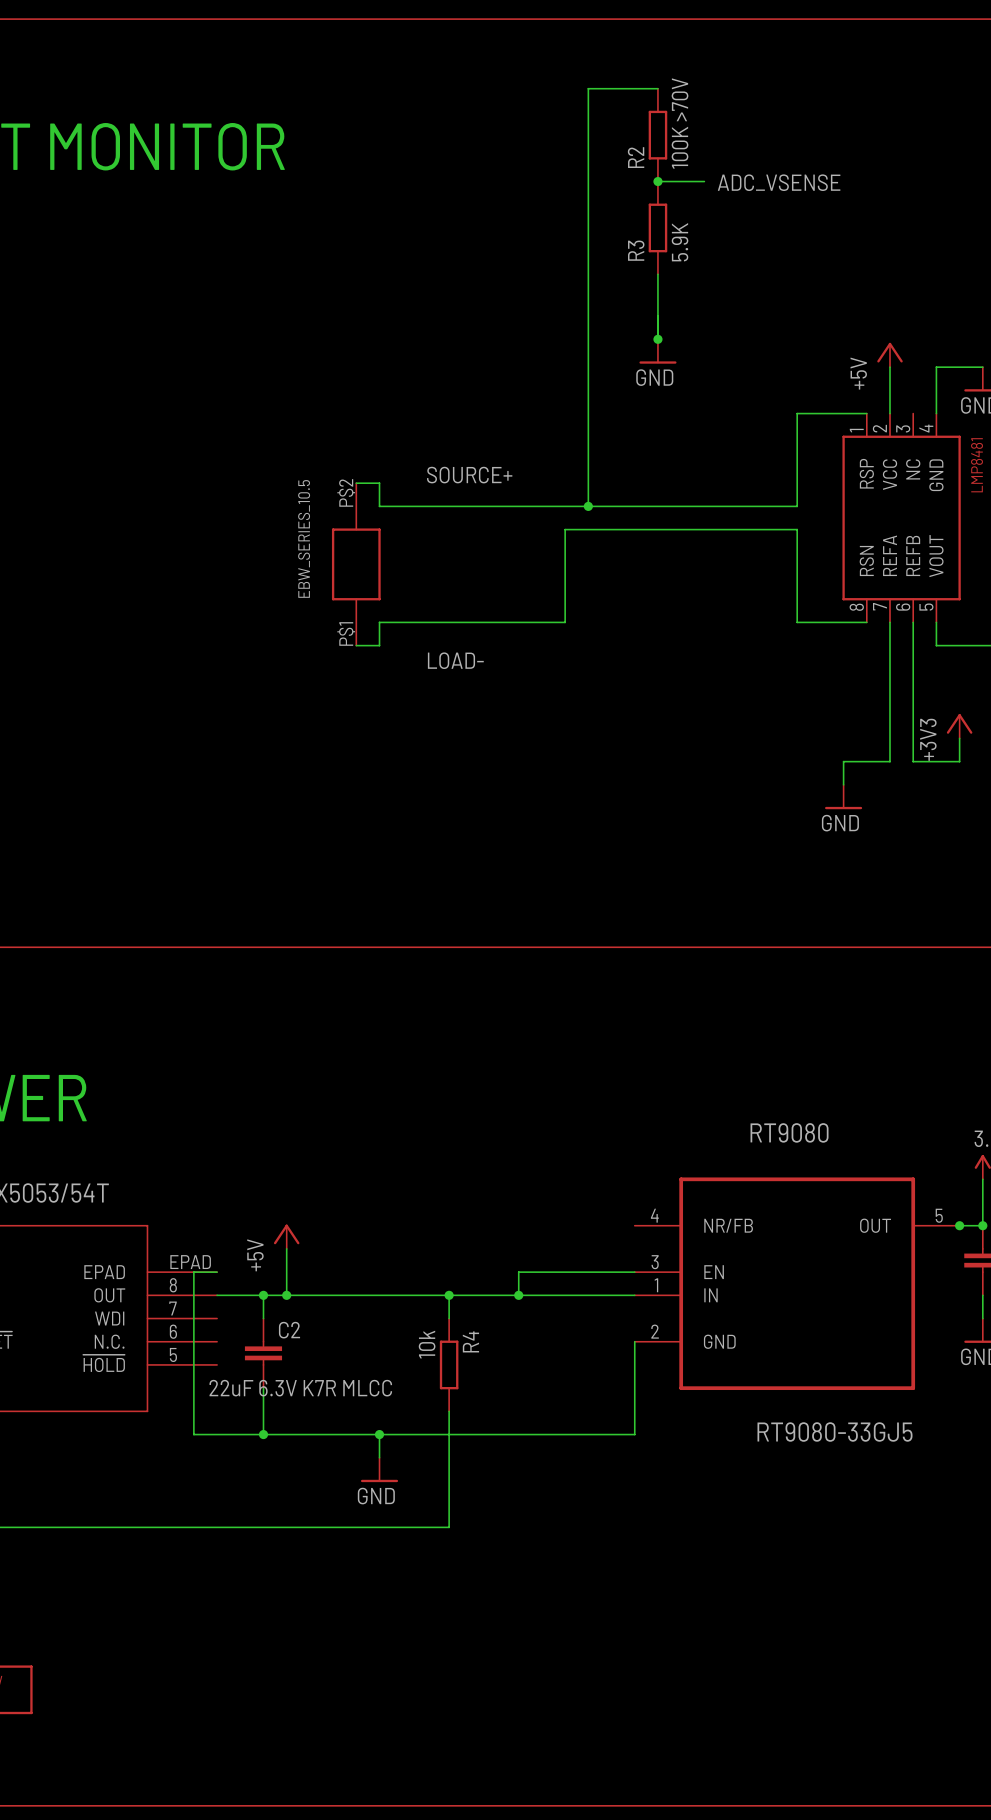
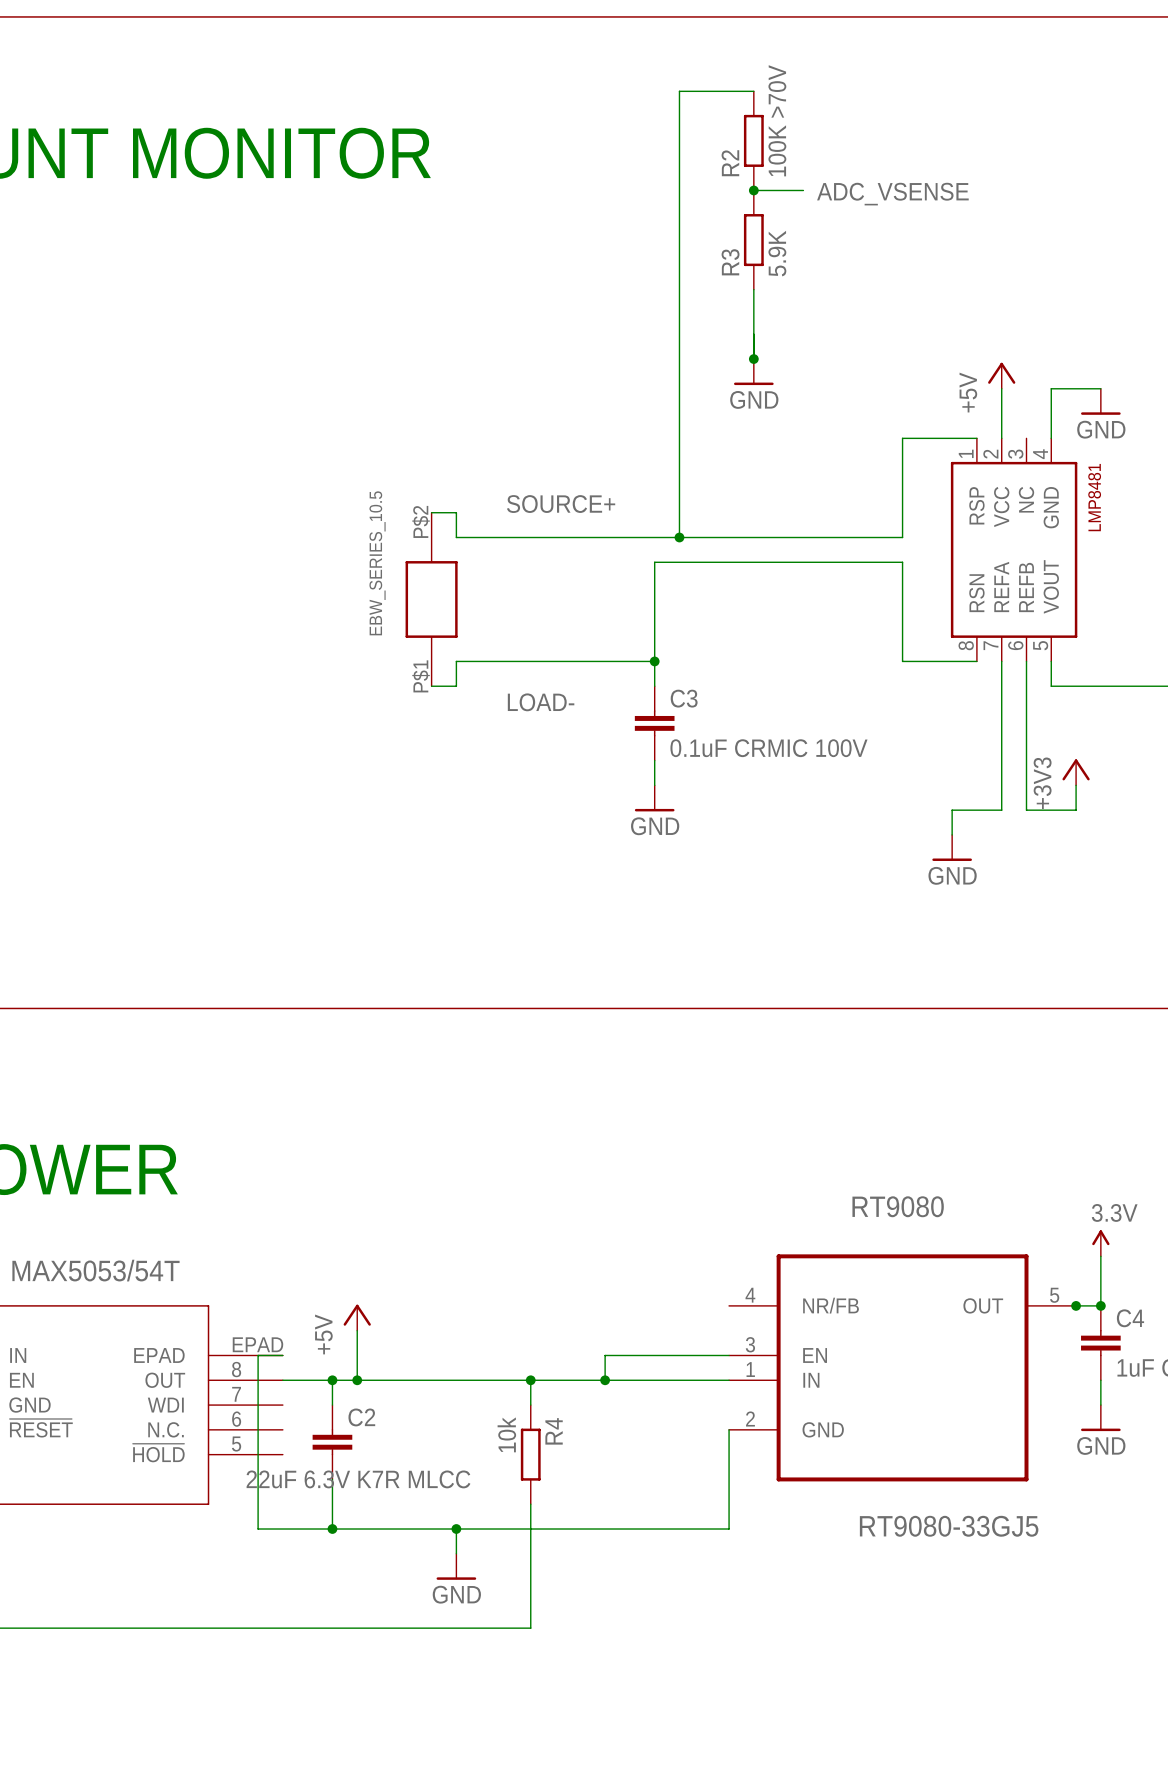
wire: none -> (654, 661) (654, 686)
junction: none -> (654, 661)
C3: none -> 0.1uF CRMIC 100V (654, 723)
wire: none -> (654, 760) (654, 785)
power symbol: none -> GND (654, 798)

